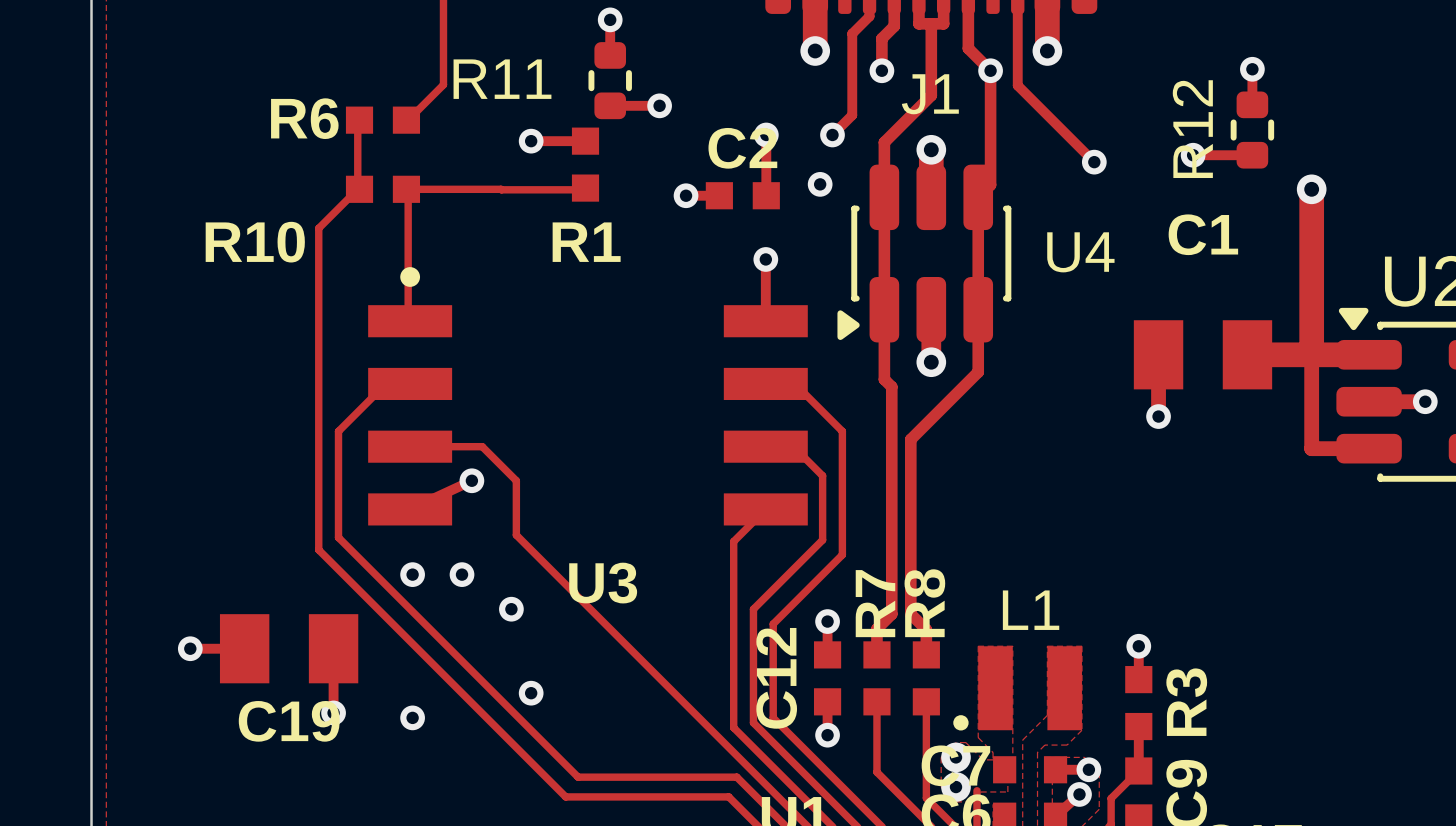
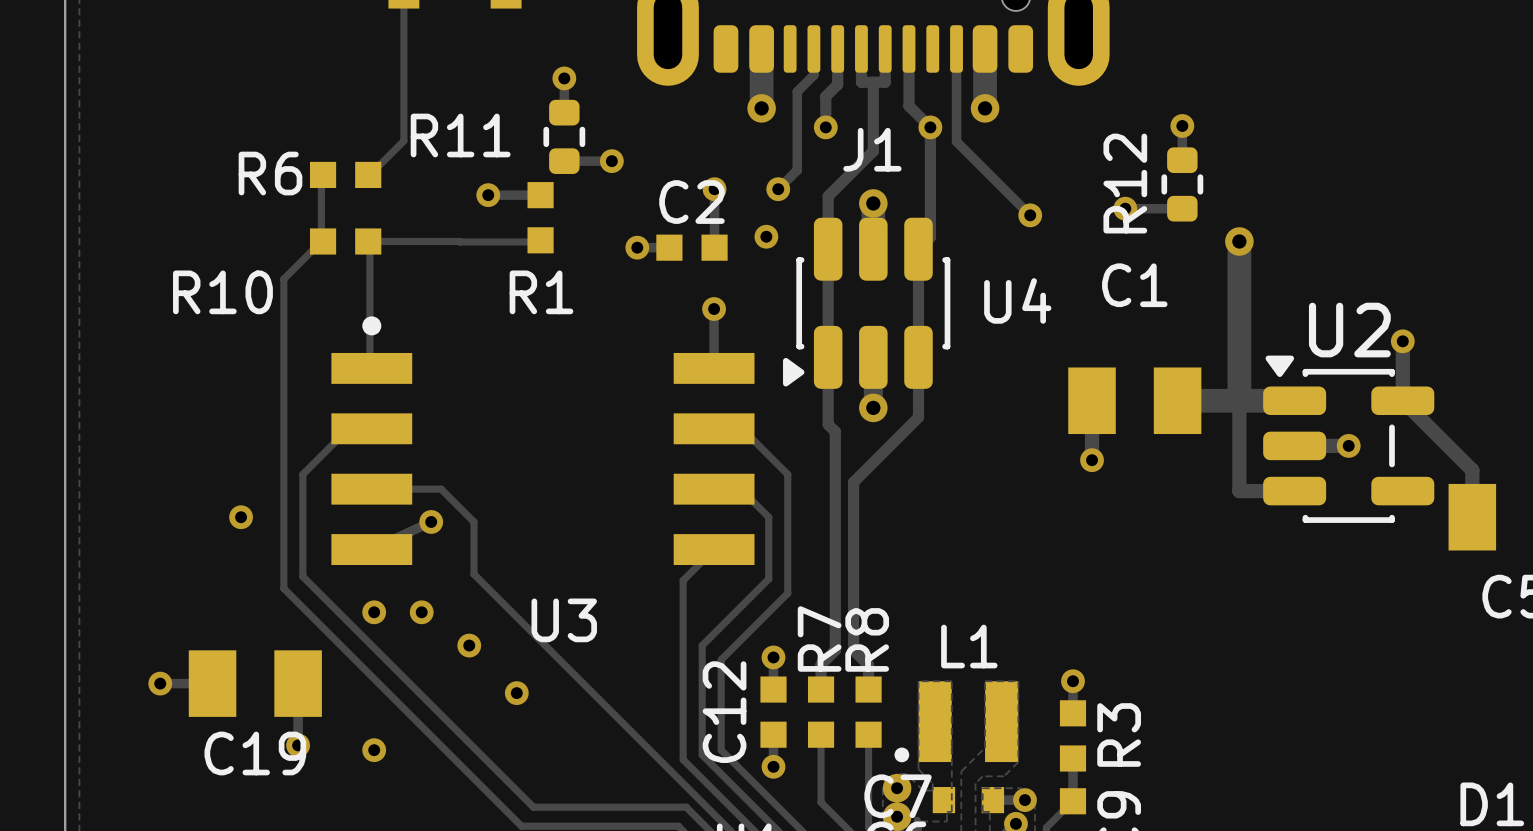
via: none -> (241, 517)
via position: (531, 693) -> (516, 693)

